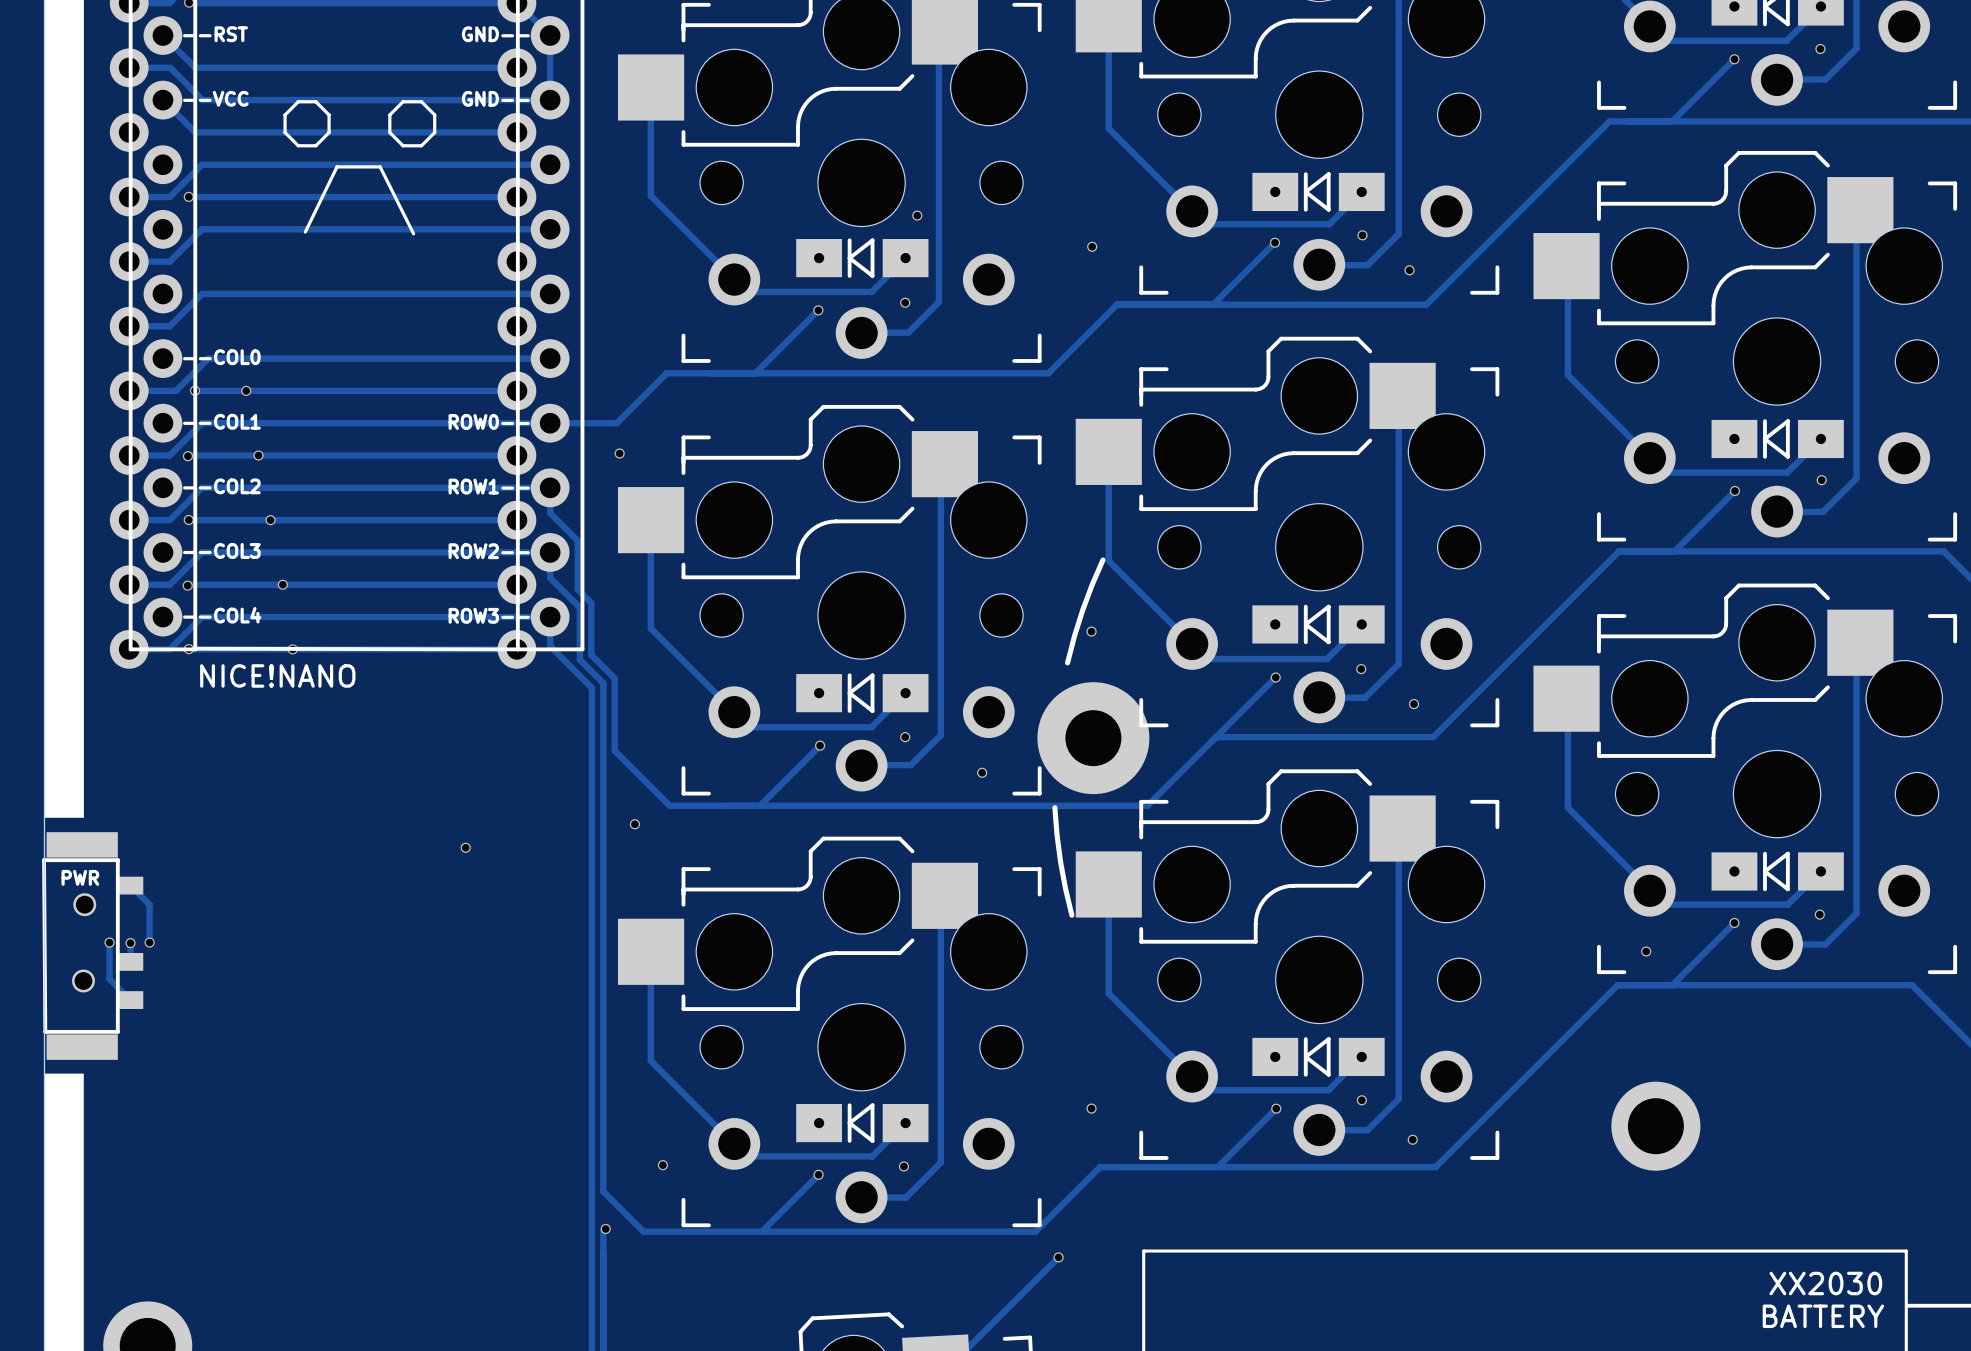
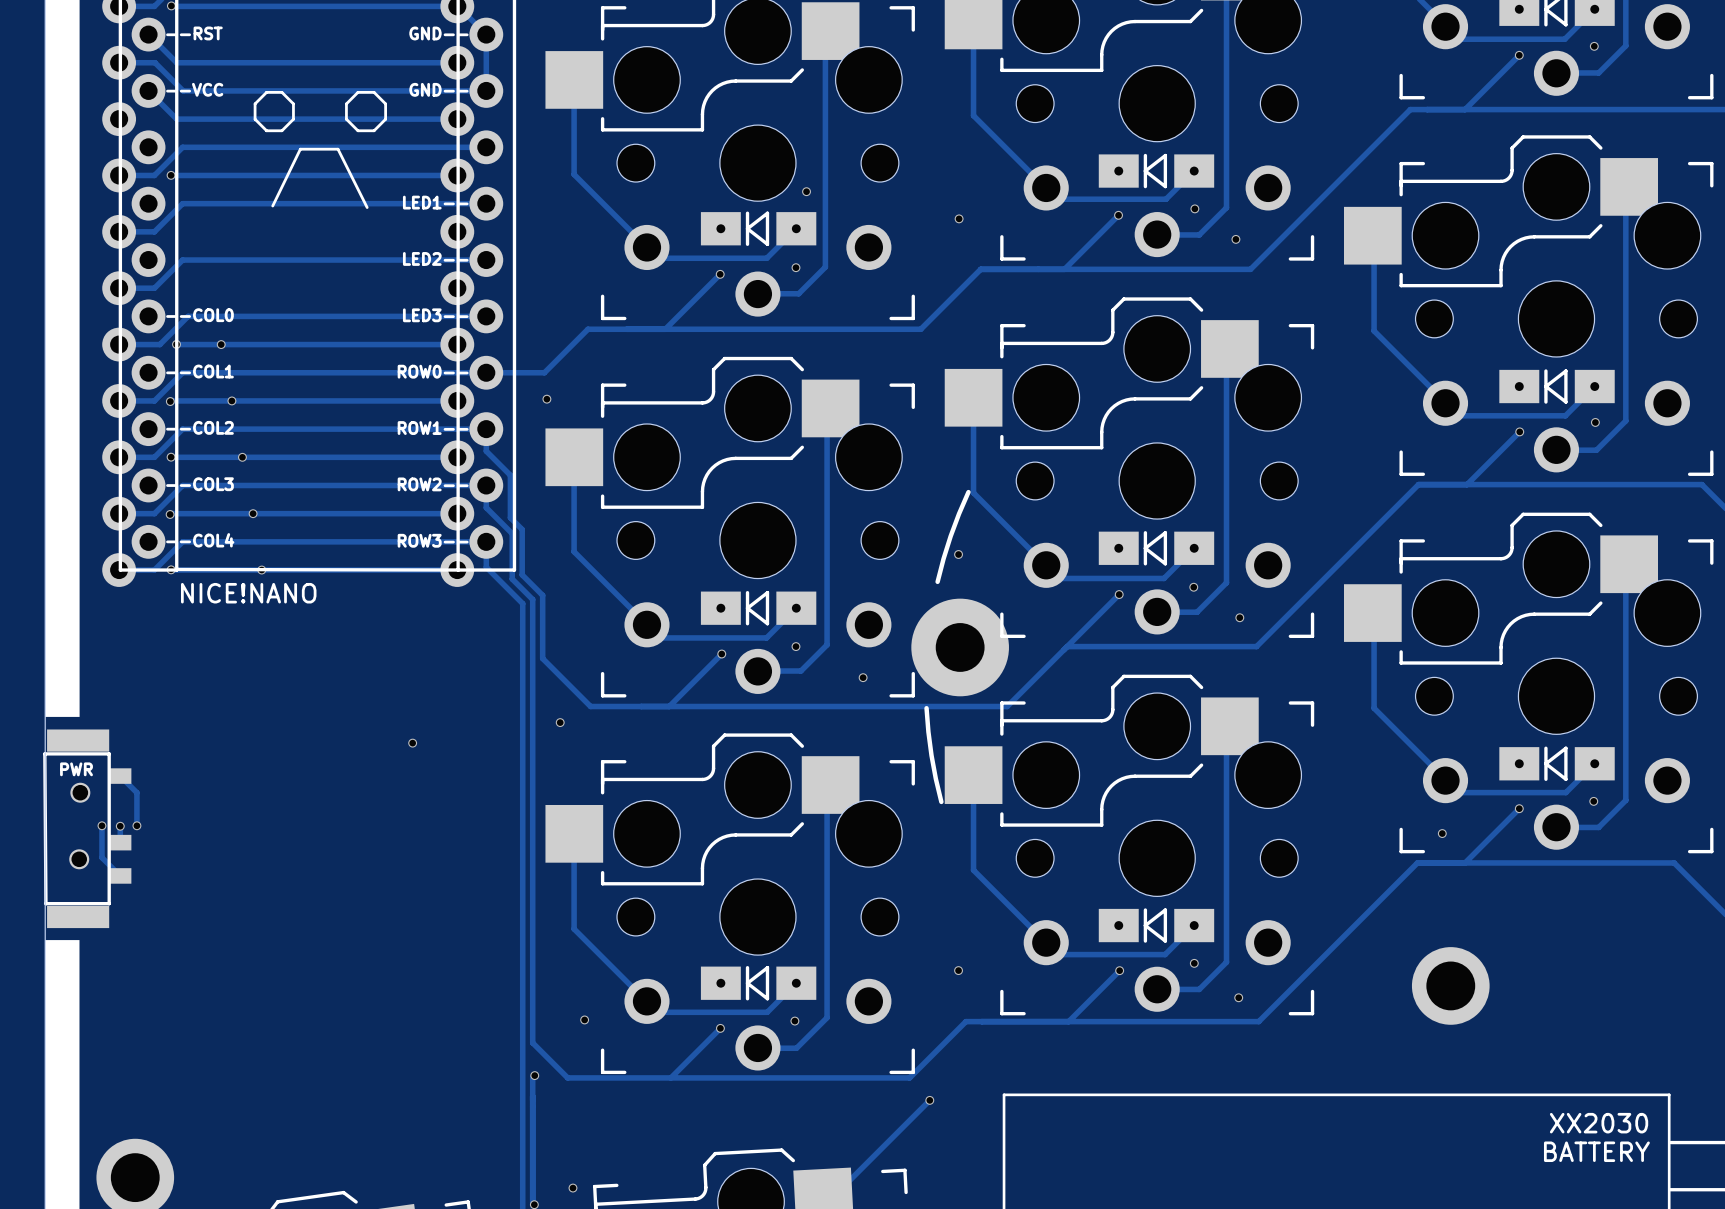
text: none -> LED1-- (435, 202)
text: none -> LED2-- (435, 258)
text: none -> LED3-- (435, 315)

